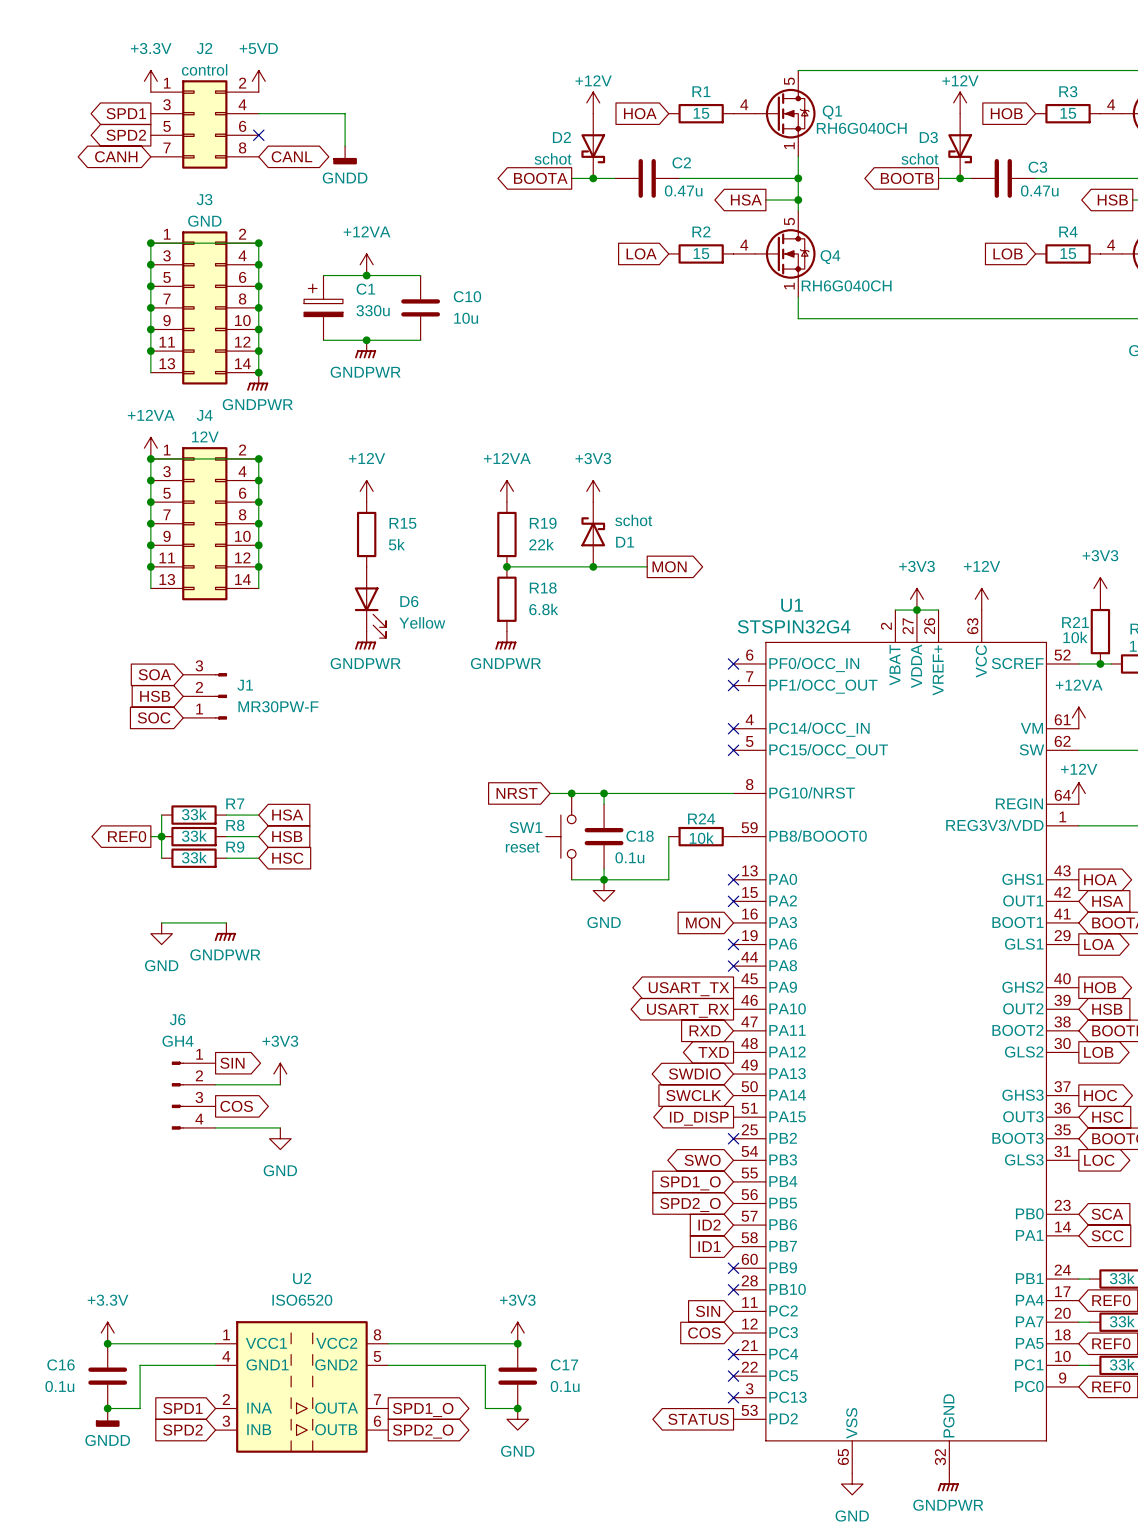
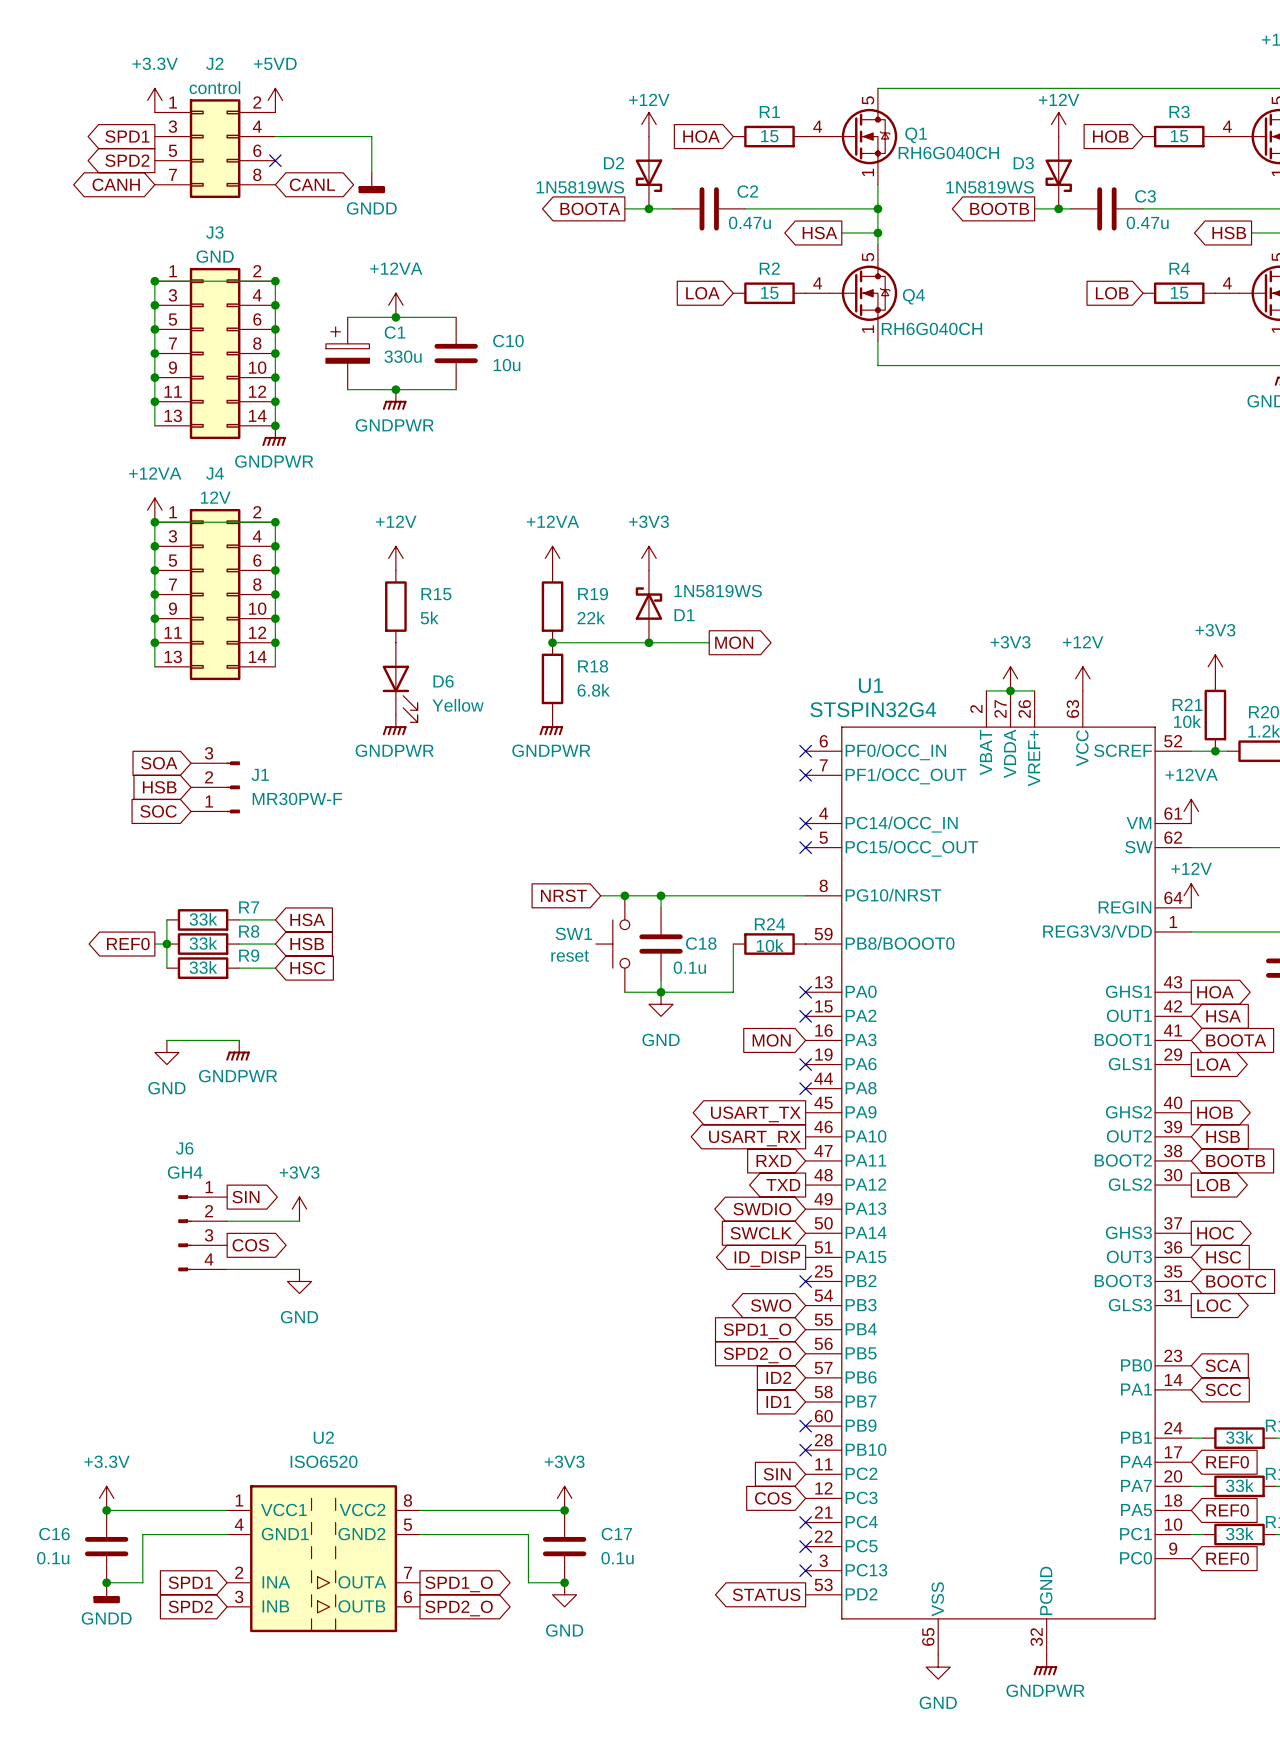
D2 value: schot (553, 158) -> 1N5819WS (580, 187)
D3 value: schot (919, 158) -> 1N5819WS (990, 187)
D1 value: schot (633, 520) -> 1N5819WS (718, 591)

